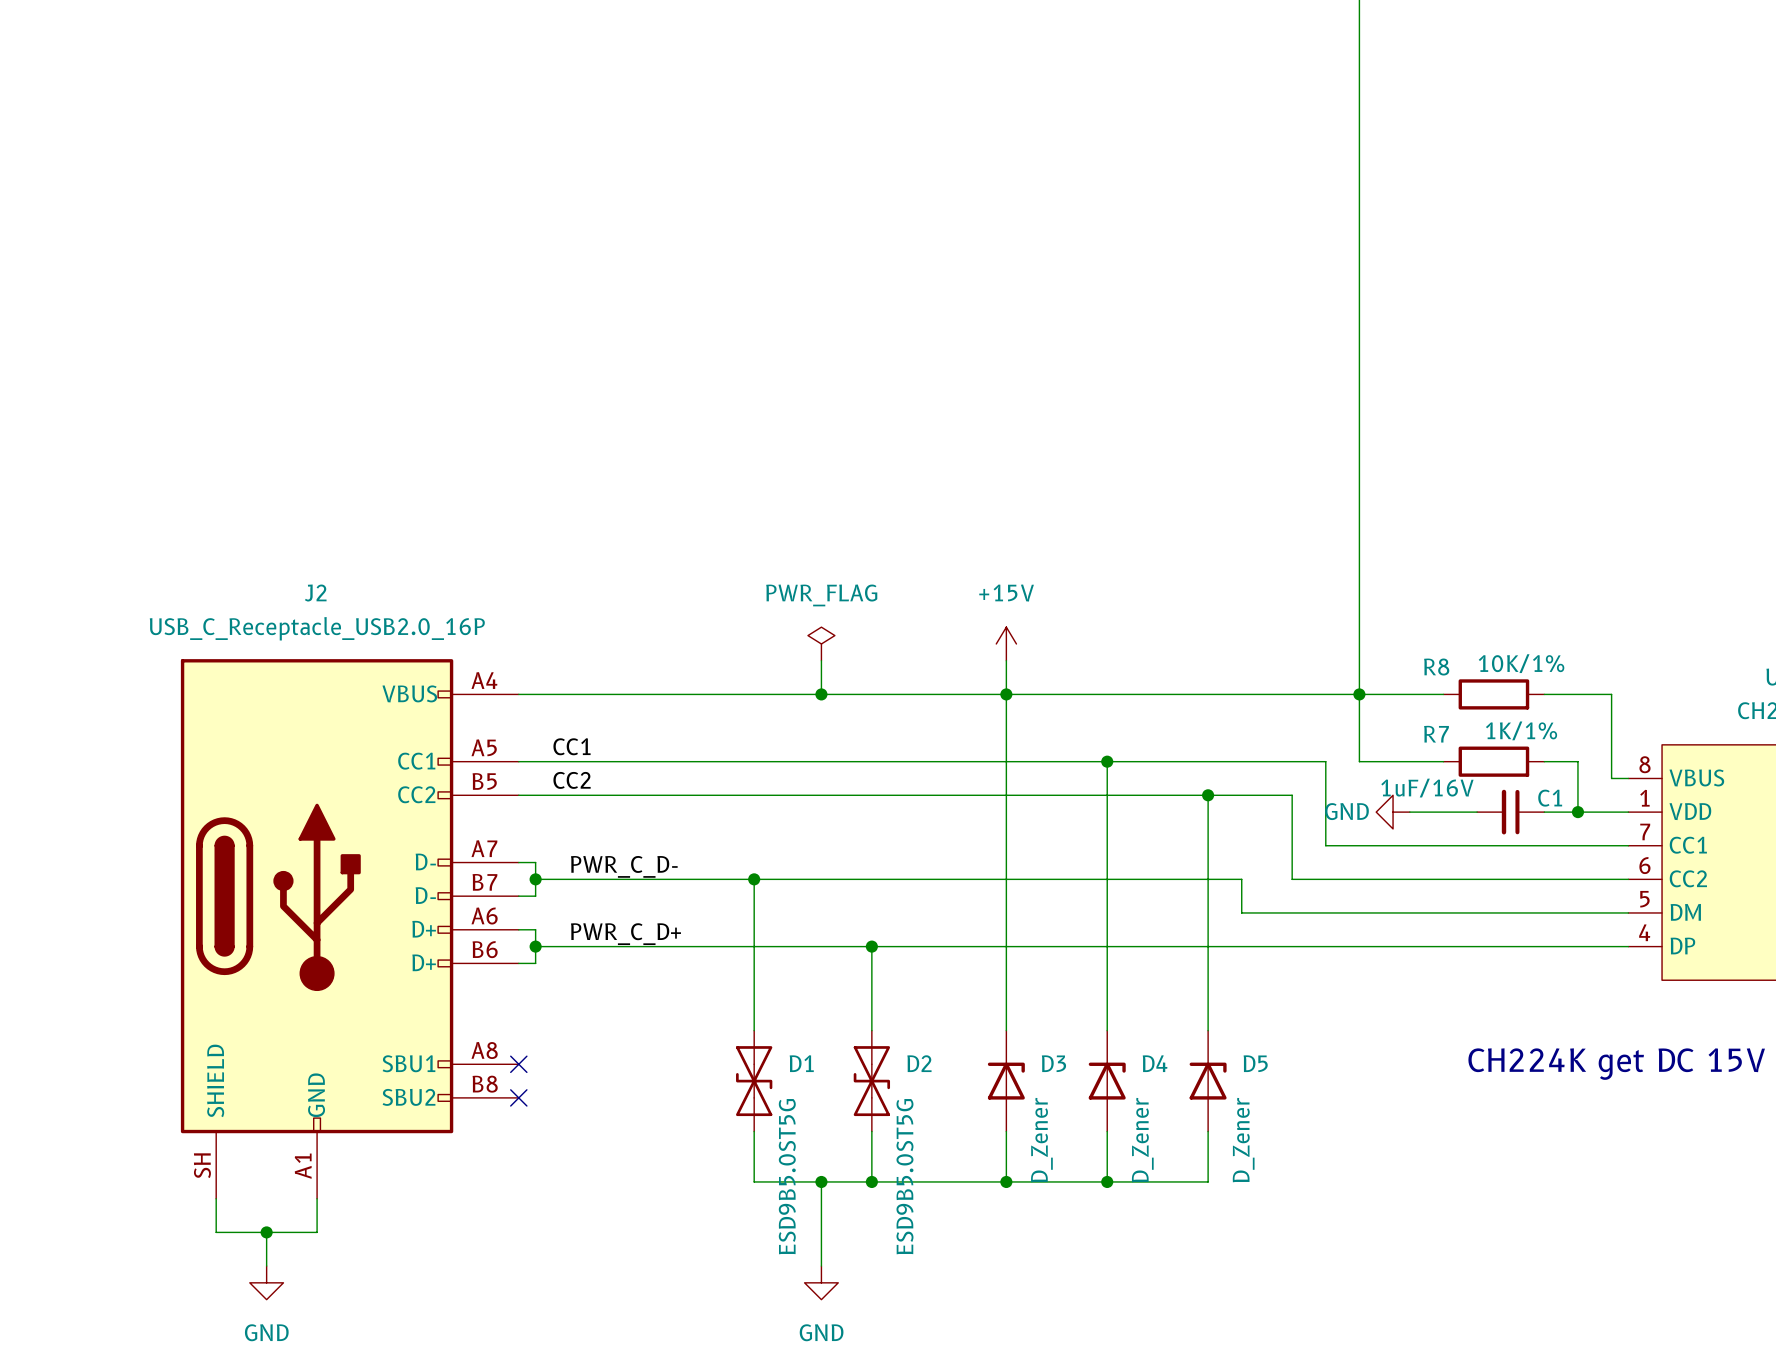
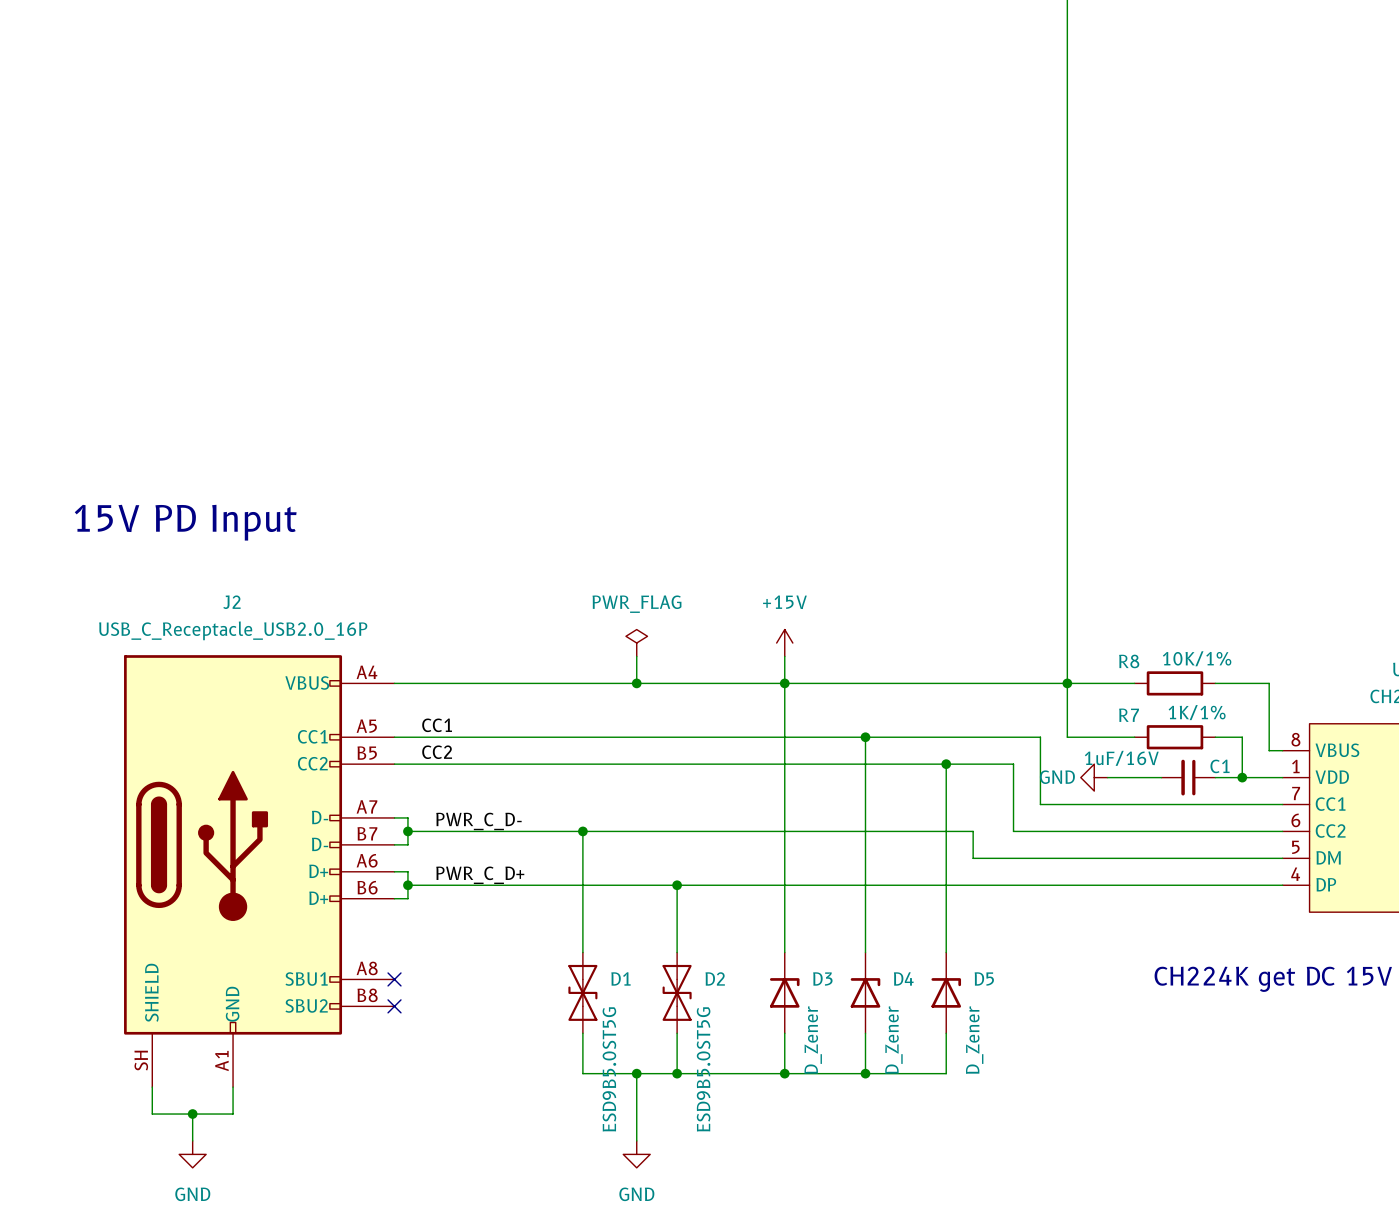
text: none -> 15V PD Input (185, 522)

